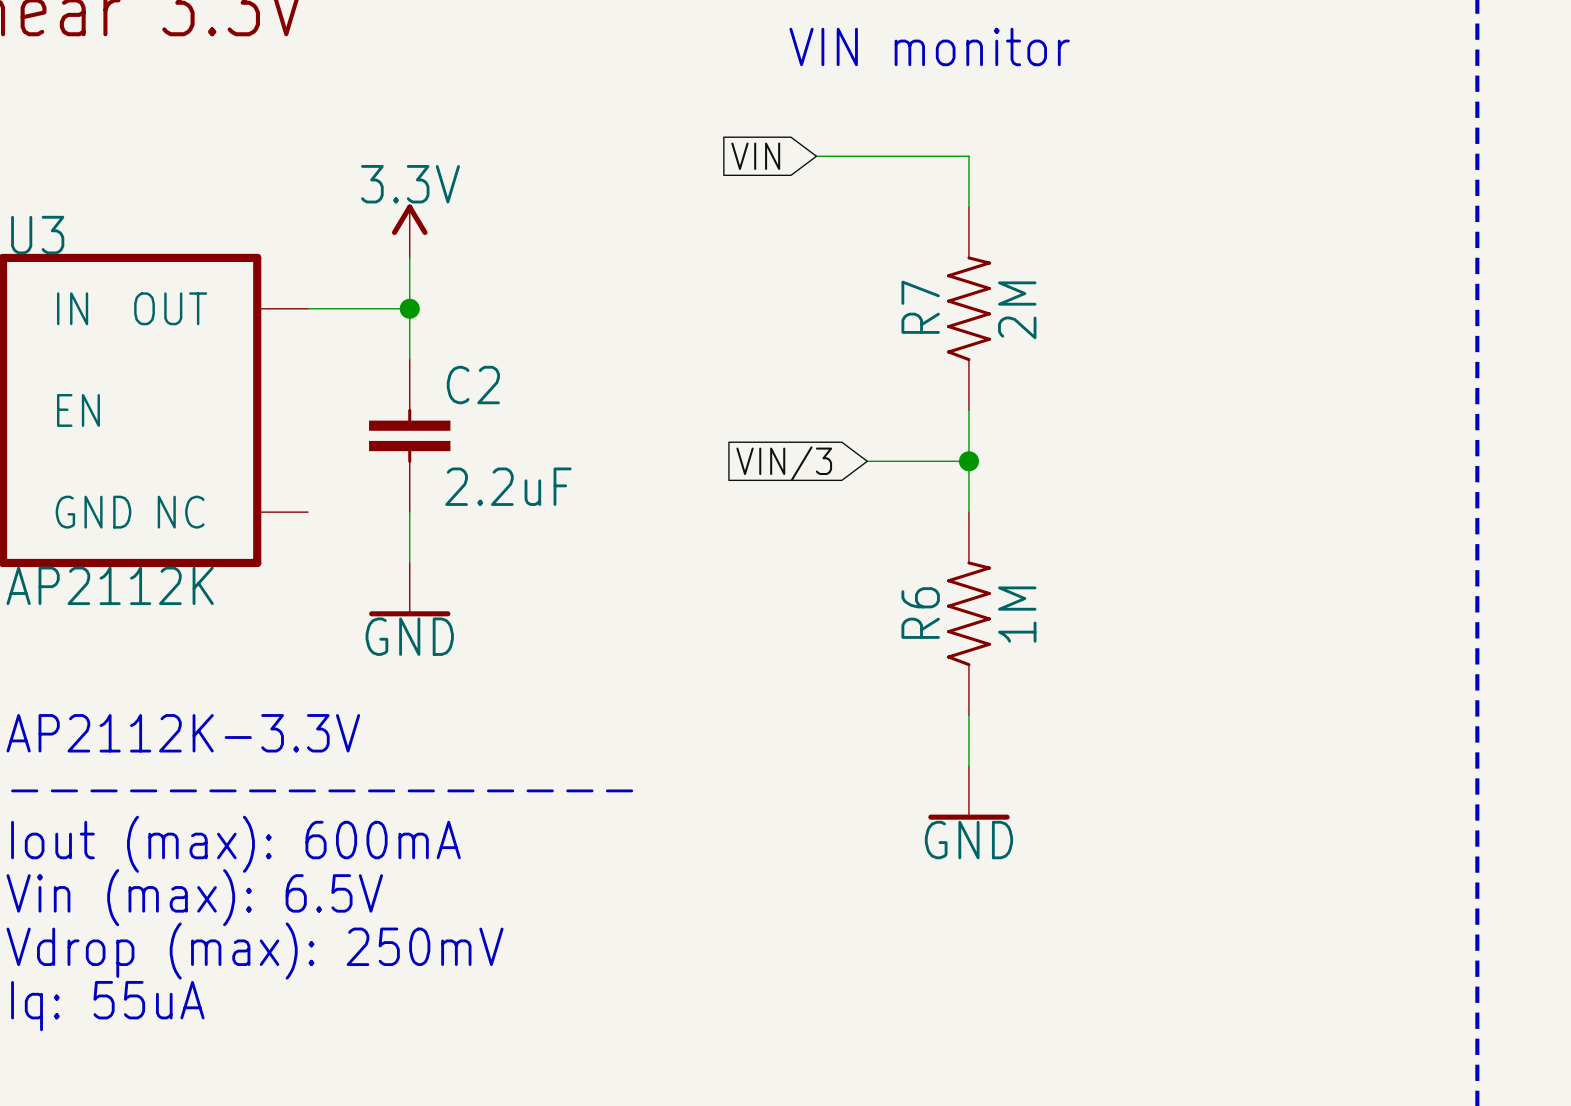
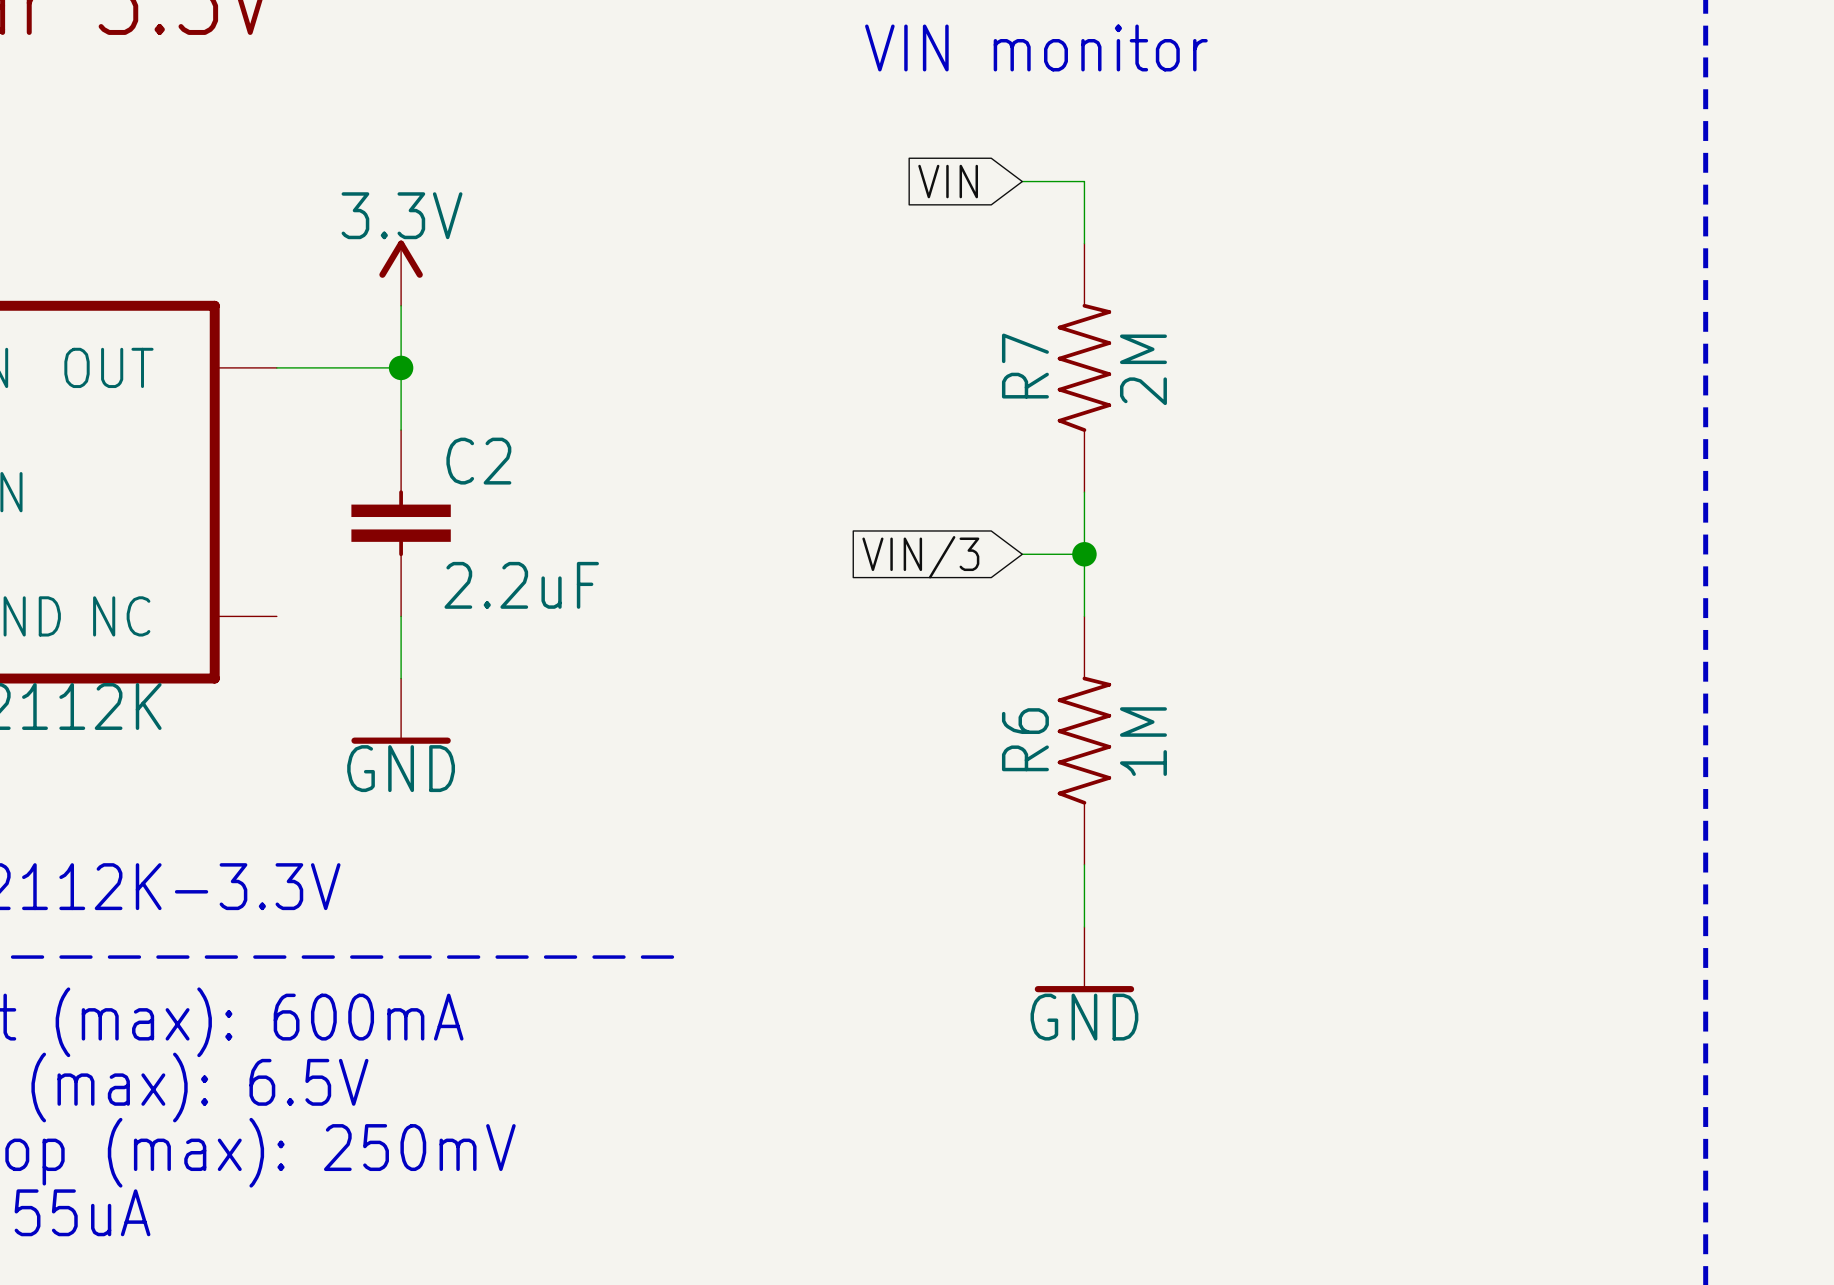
global label position: VIN (755, 156) -> VIN (948, 181)
wire: (816, 156) (918, 156) -> none
wire: (867, 461) (918, 461) -> none
global label position: VIN/3 (784, 463) -> VIN/3 (920, 557)

